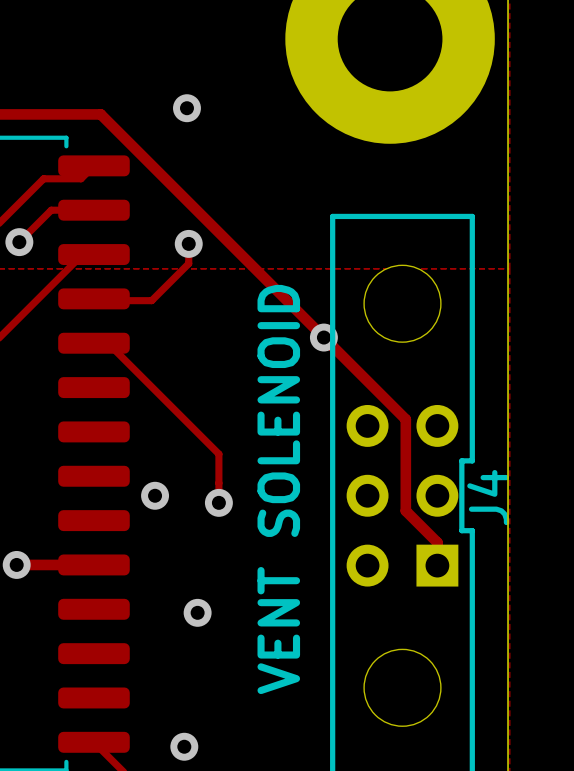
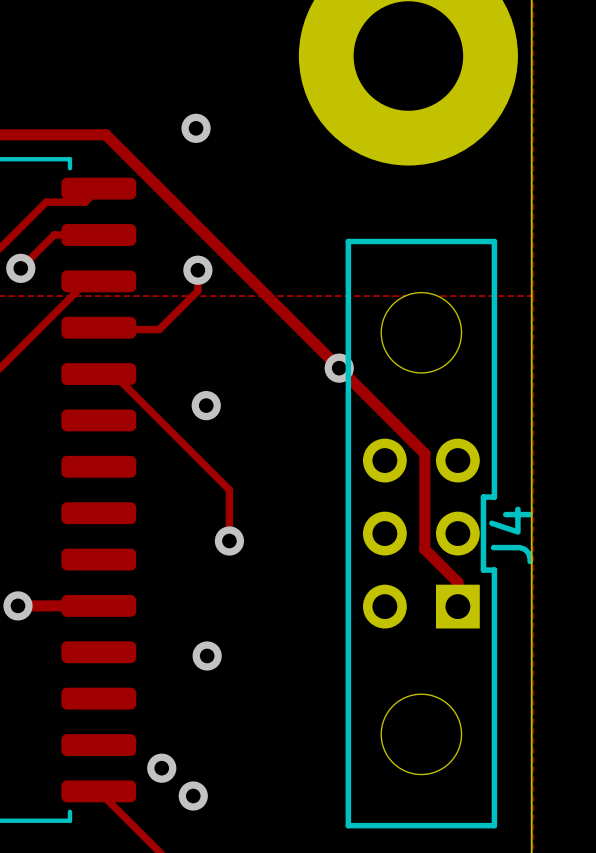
via: none -> (206, 405)
text: VENT SOLENOID (278, 489) -> none
via: (155, 495) -> none
via: none -> (161, 768)

